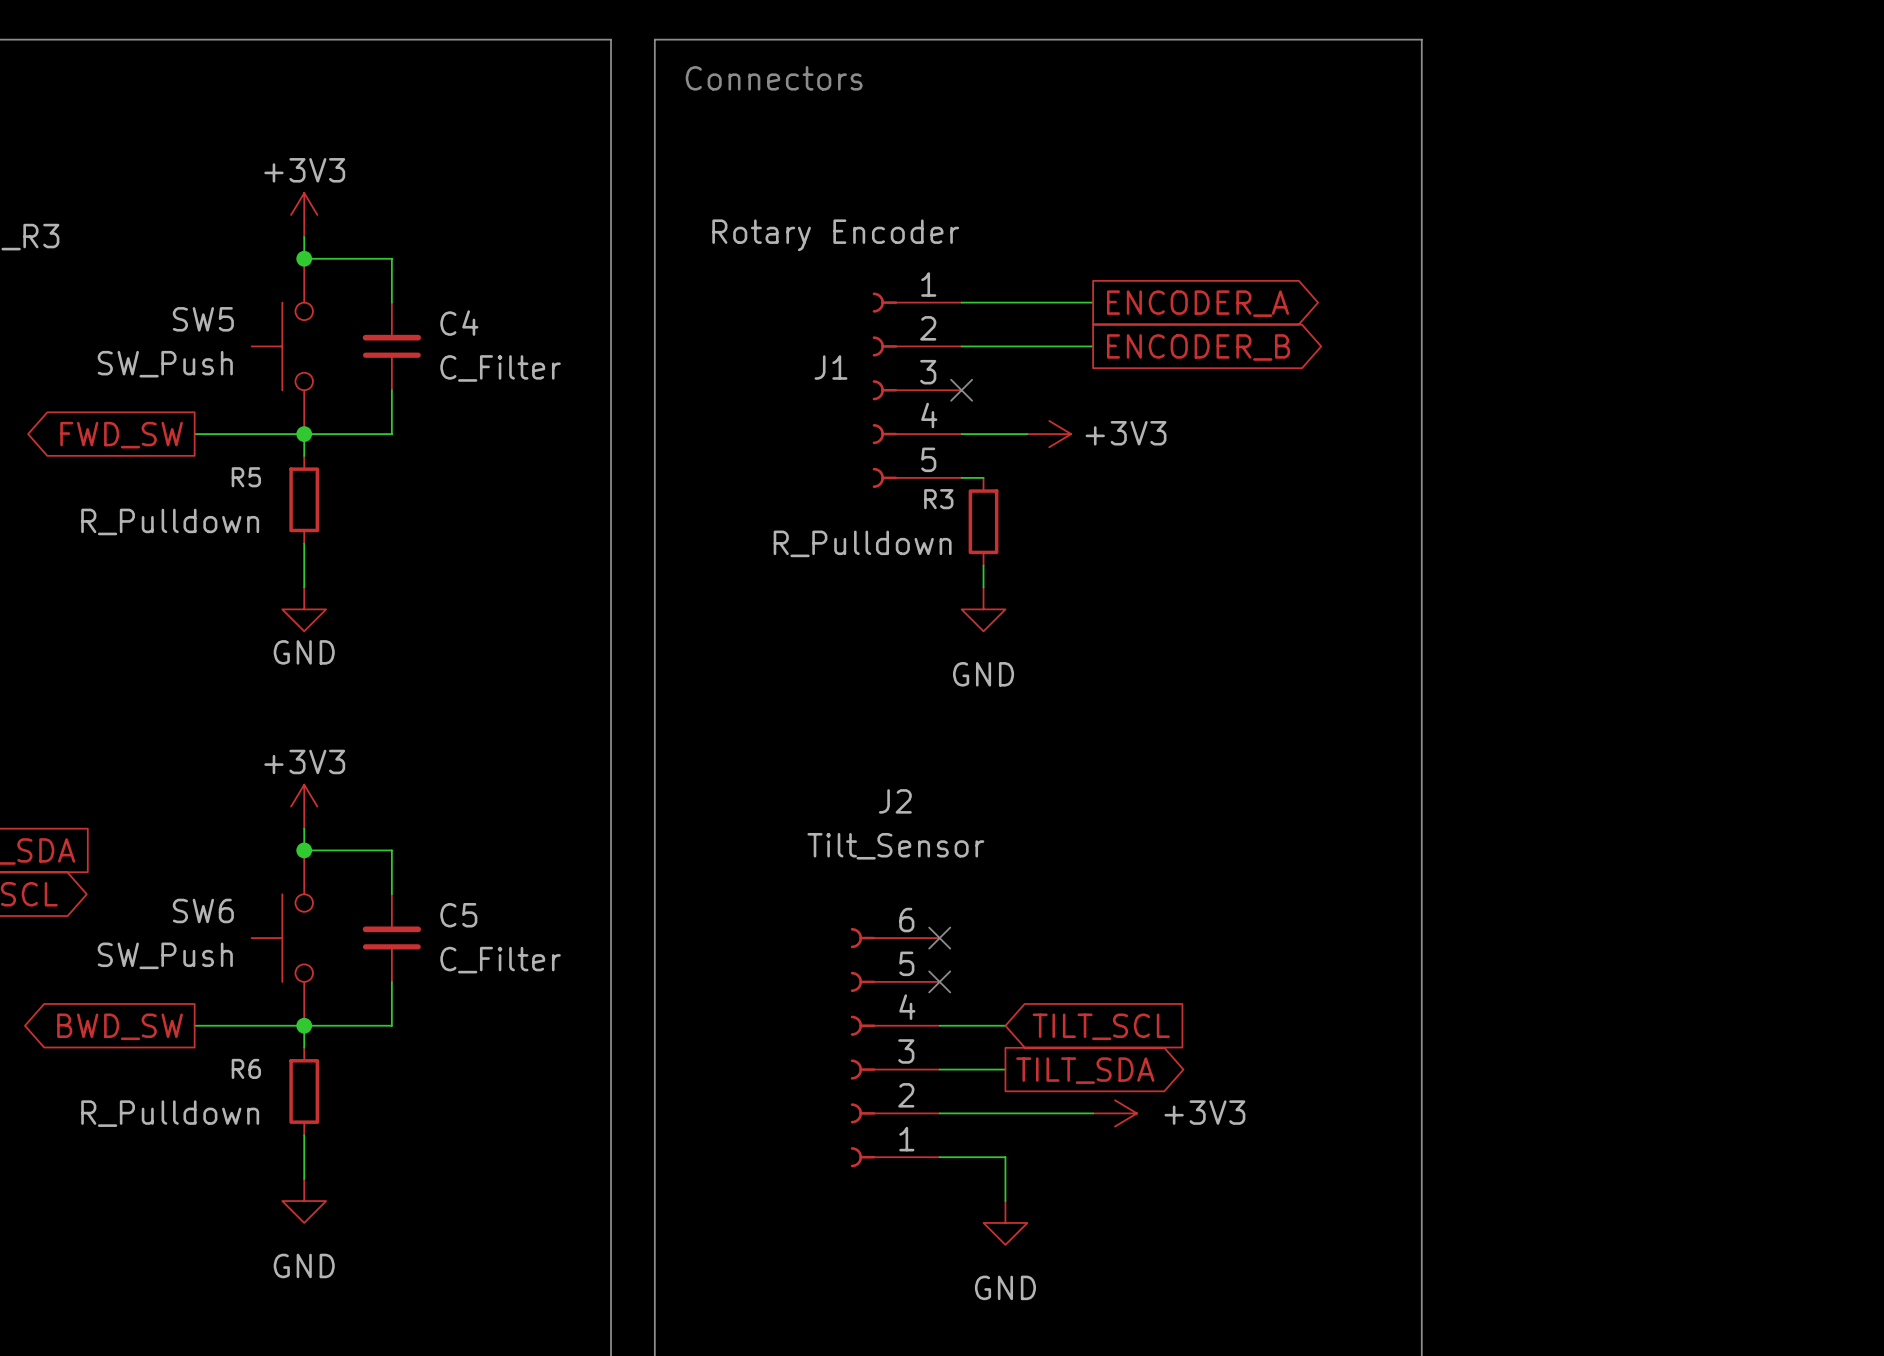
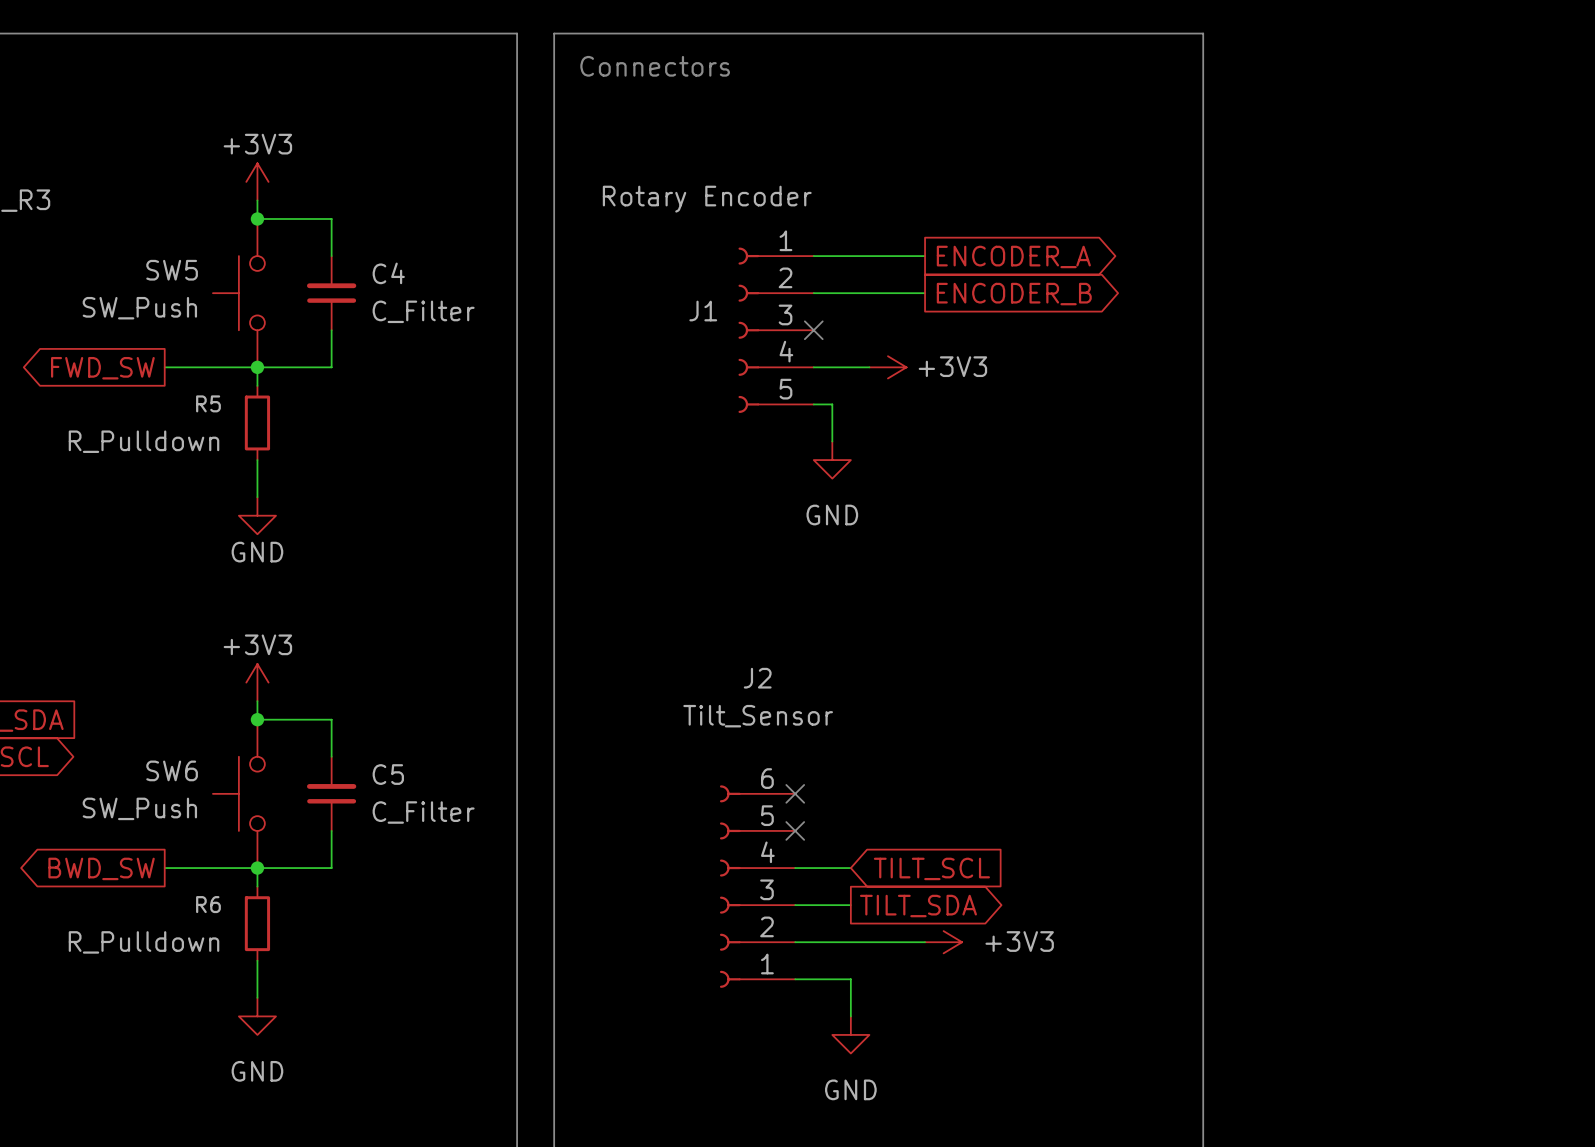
wire: none -> (832, 404) (832, 441)
R3: R_Pulldown (983, 521) -> none
wire: (983, 565) (983, 587) -> none
power symbol position: GND (983, 609) -> GND (832, 460)

